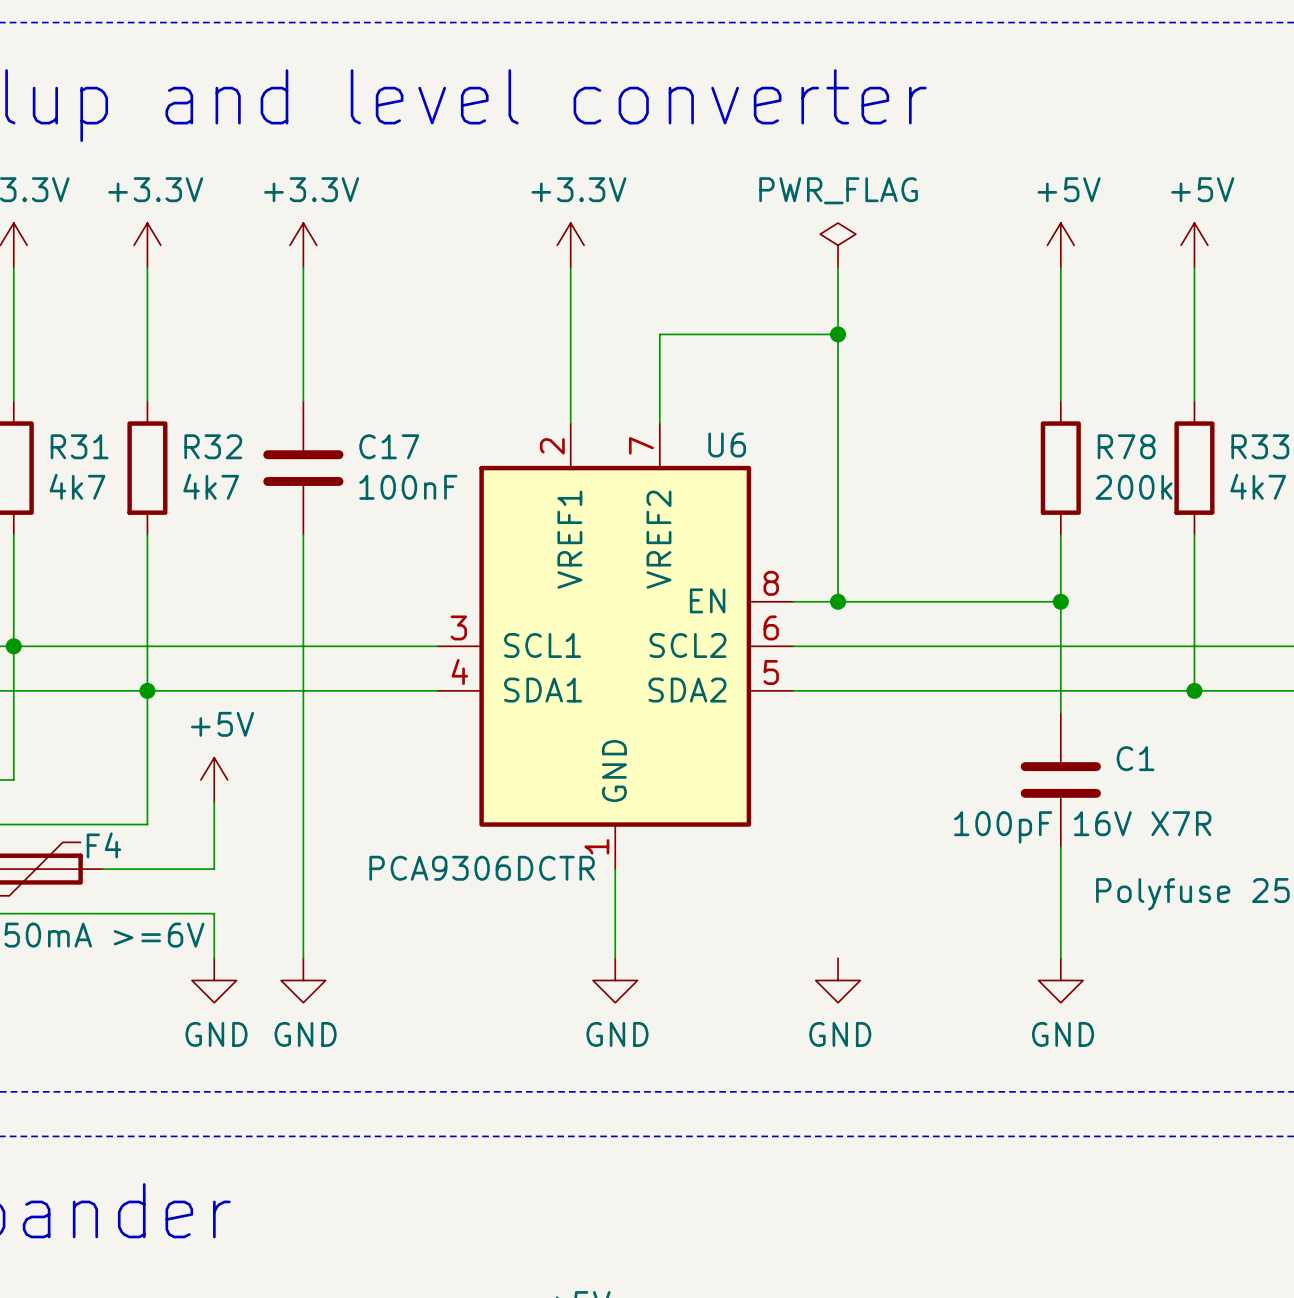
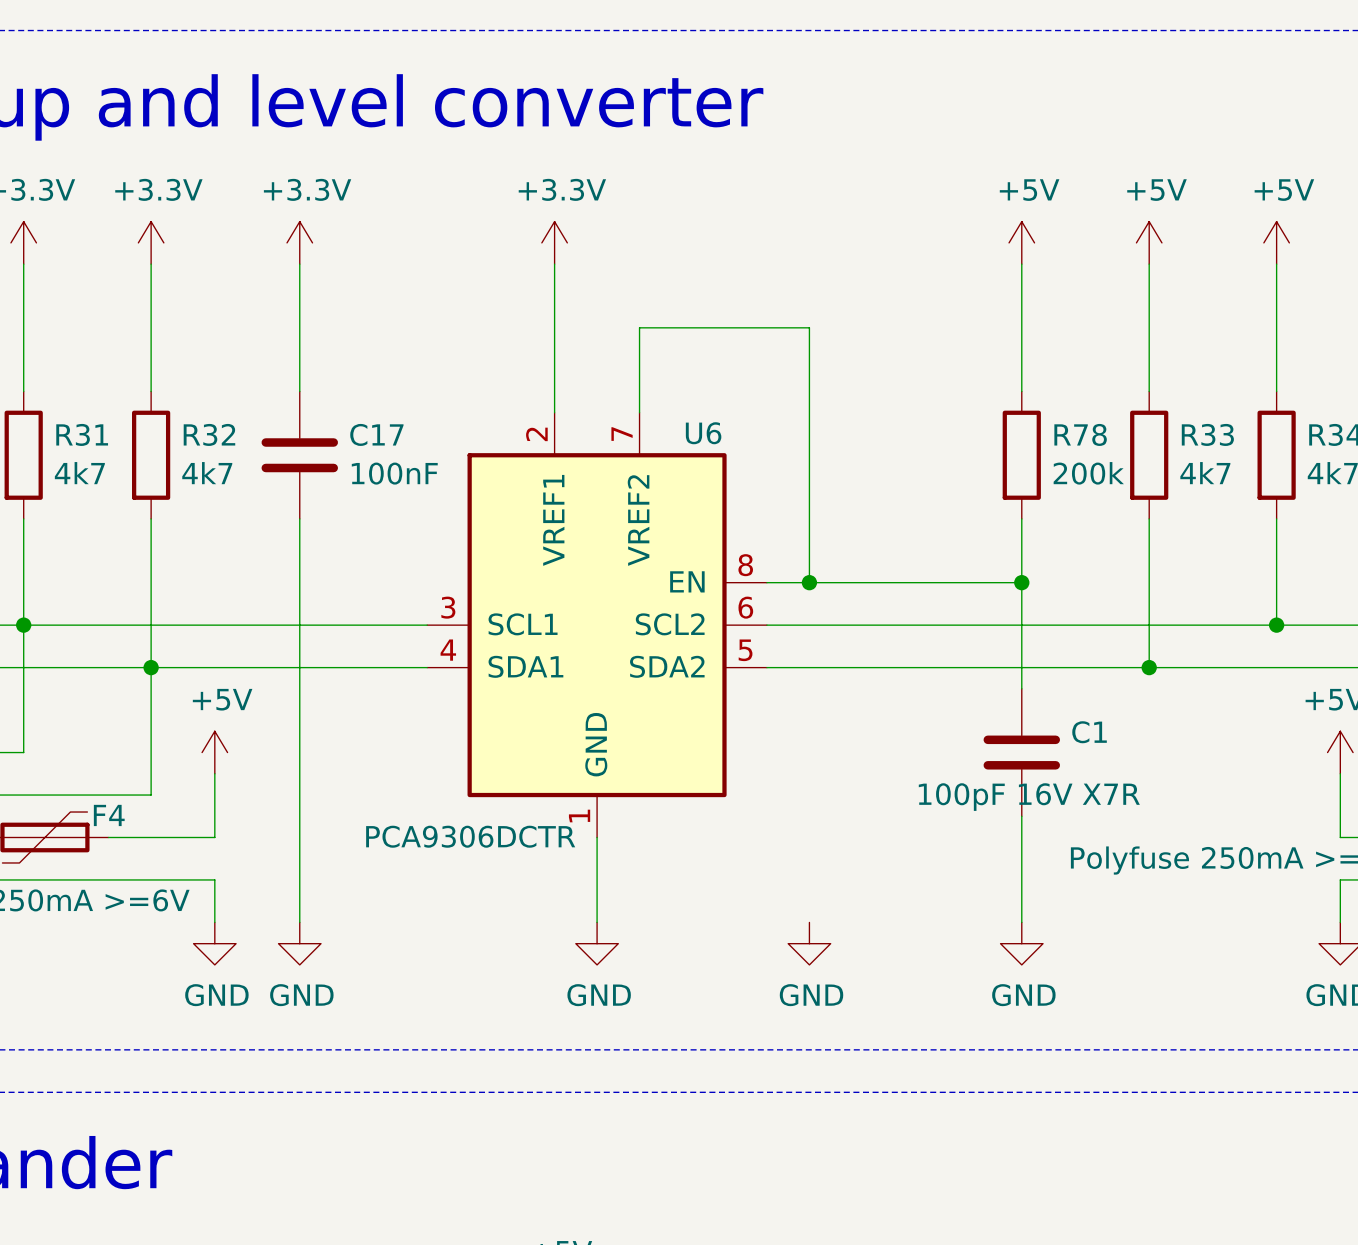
power symbol: PWR_FLAG (838, 245) -> none
wire: (838, 267) (838, 334) -> none
junction: (838, 334) -> none

